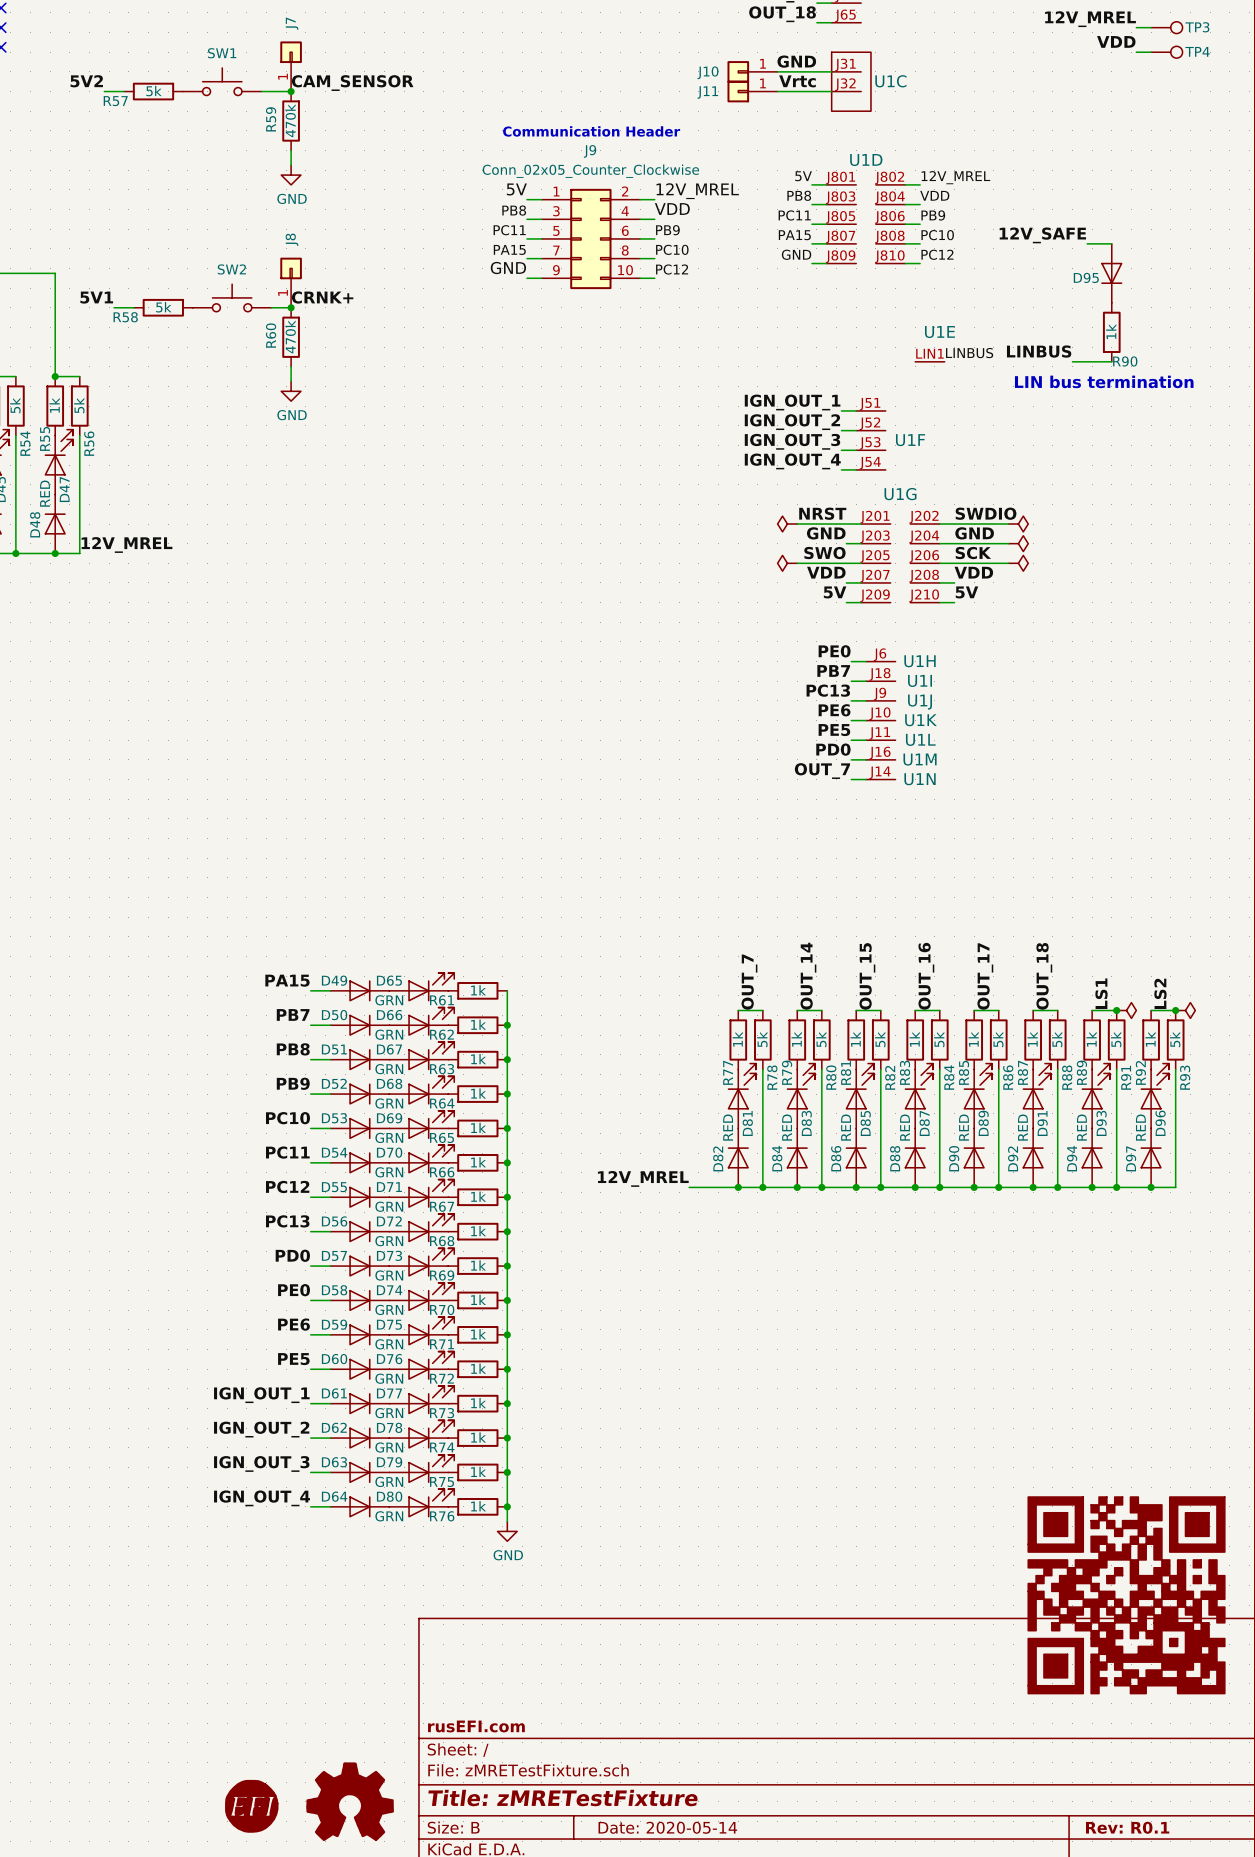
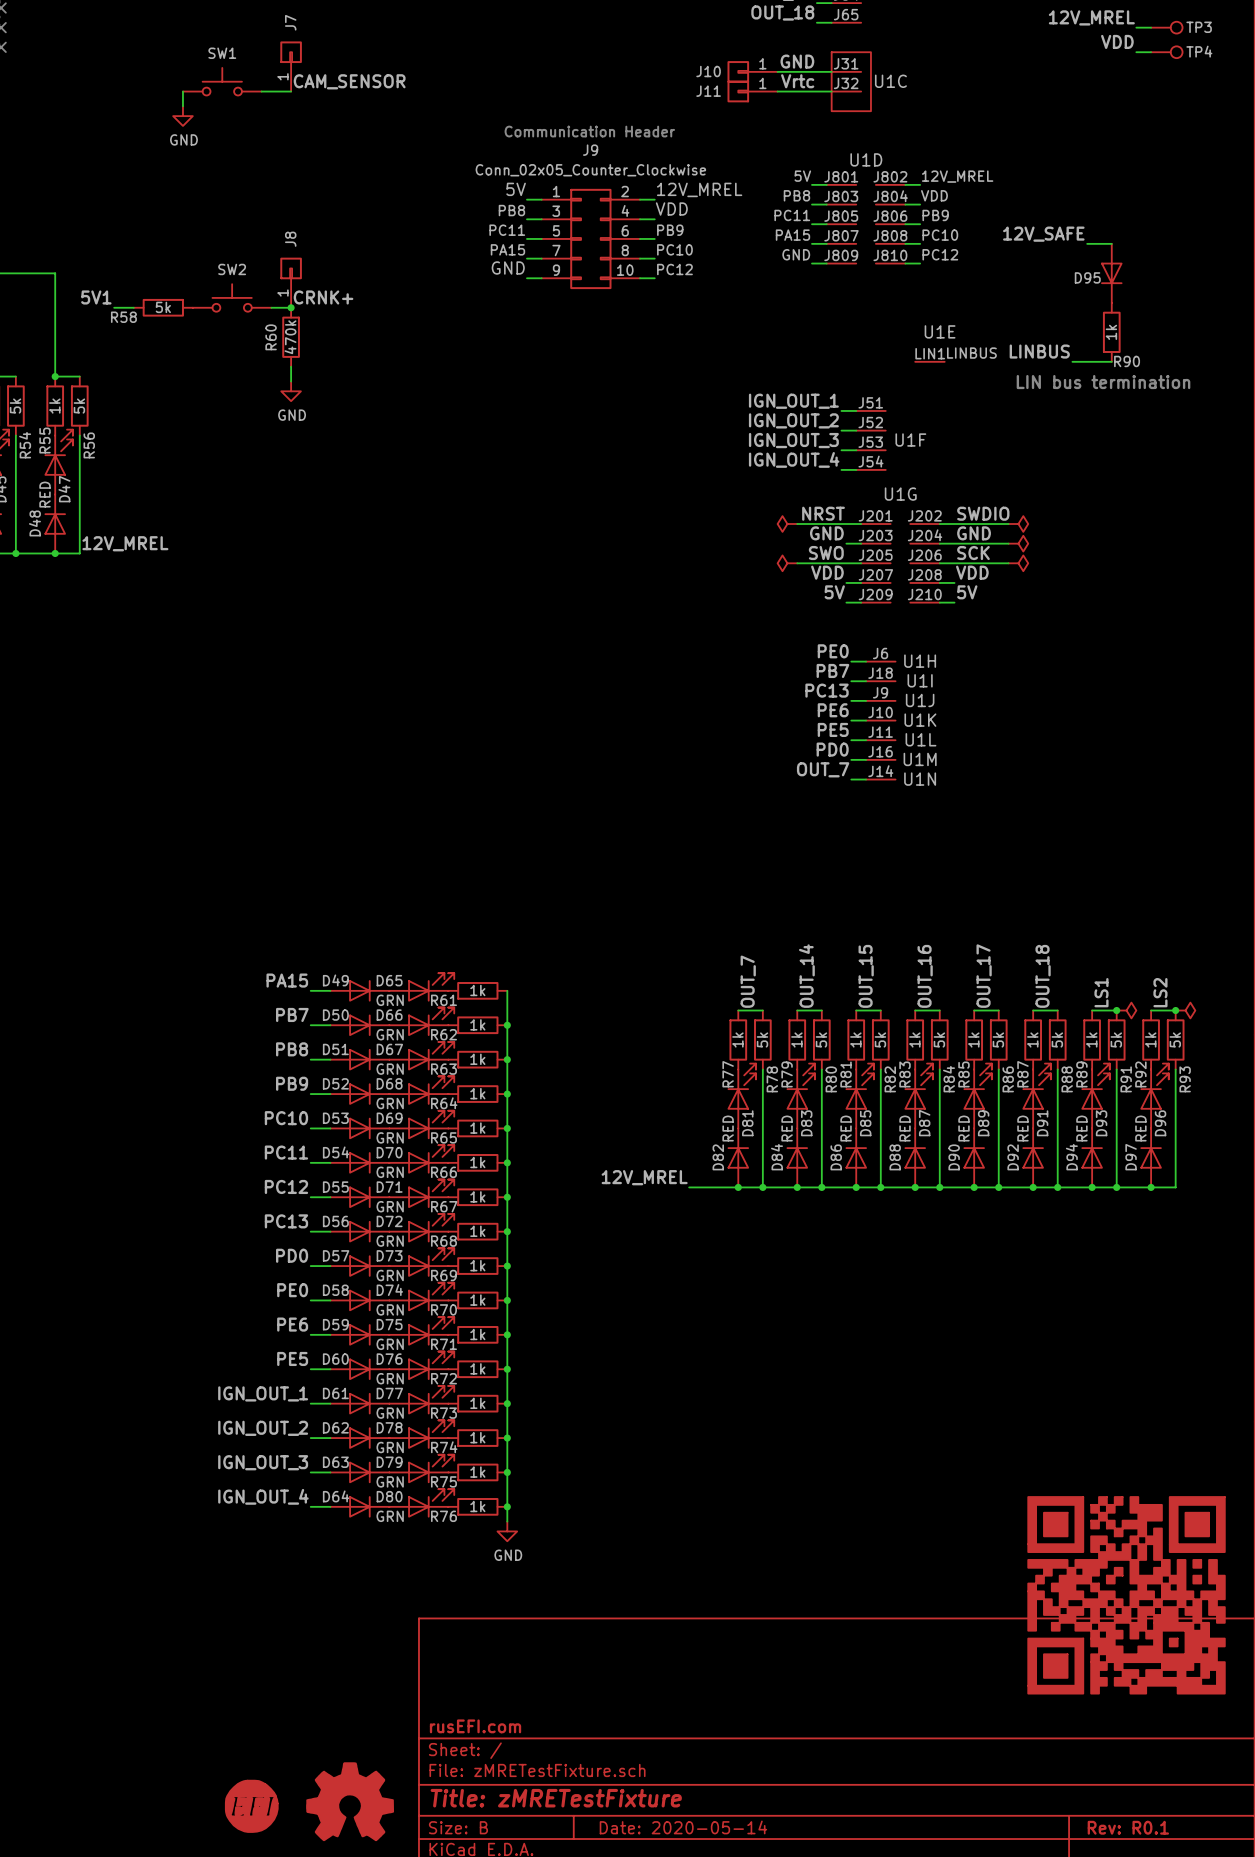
label: 5V2 (86, 81) -> none
wire: (104, 91) (124, 91) -> none
R57: 5k (153, 91) -> none
junction: (291, 91) -> none
R59: 470k (291, 121) -> none
wire: (291, 150) (291, 165) -> (182, 91) (182, 106)
power symbol position: GND (291, 175) -> GND (182, 116)

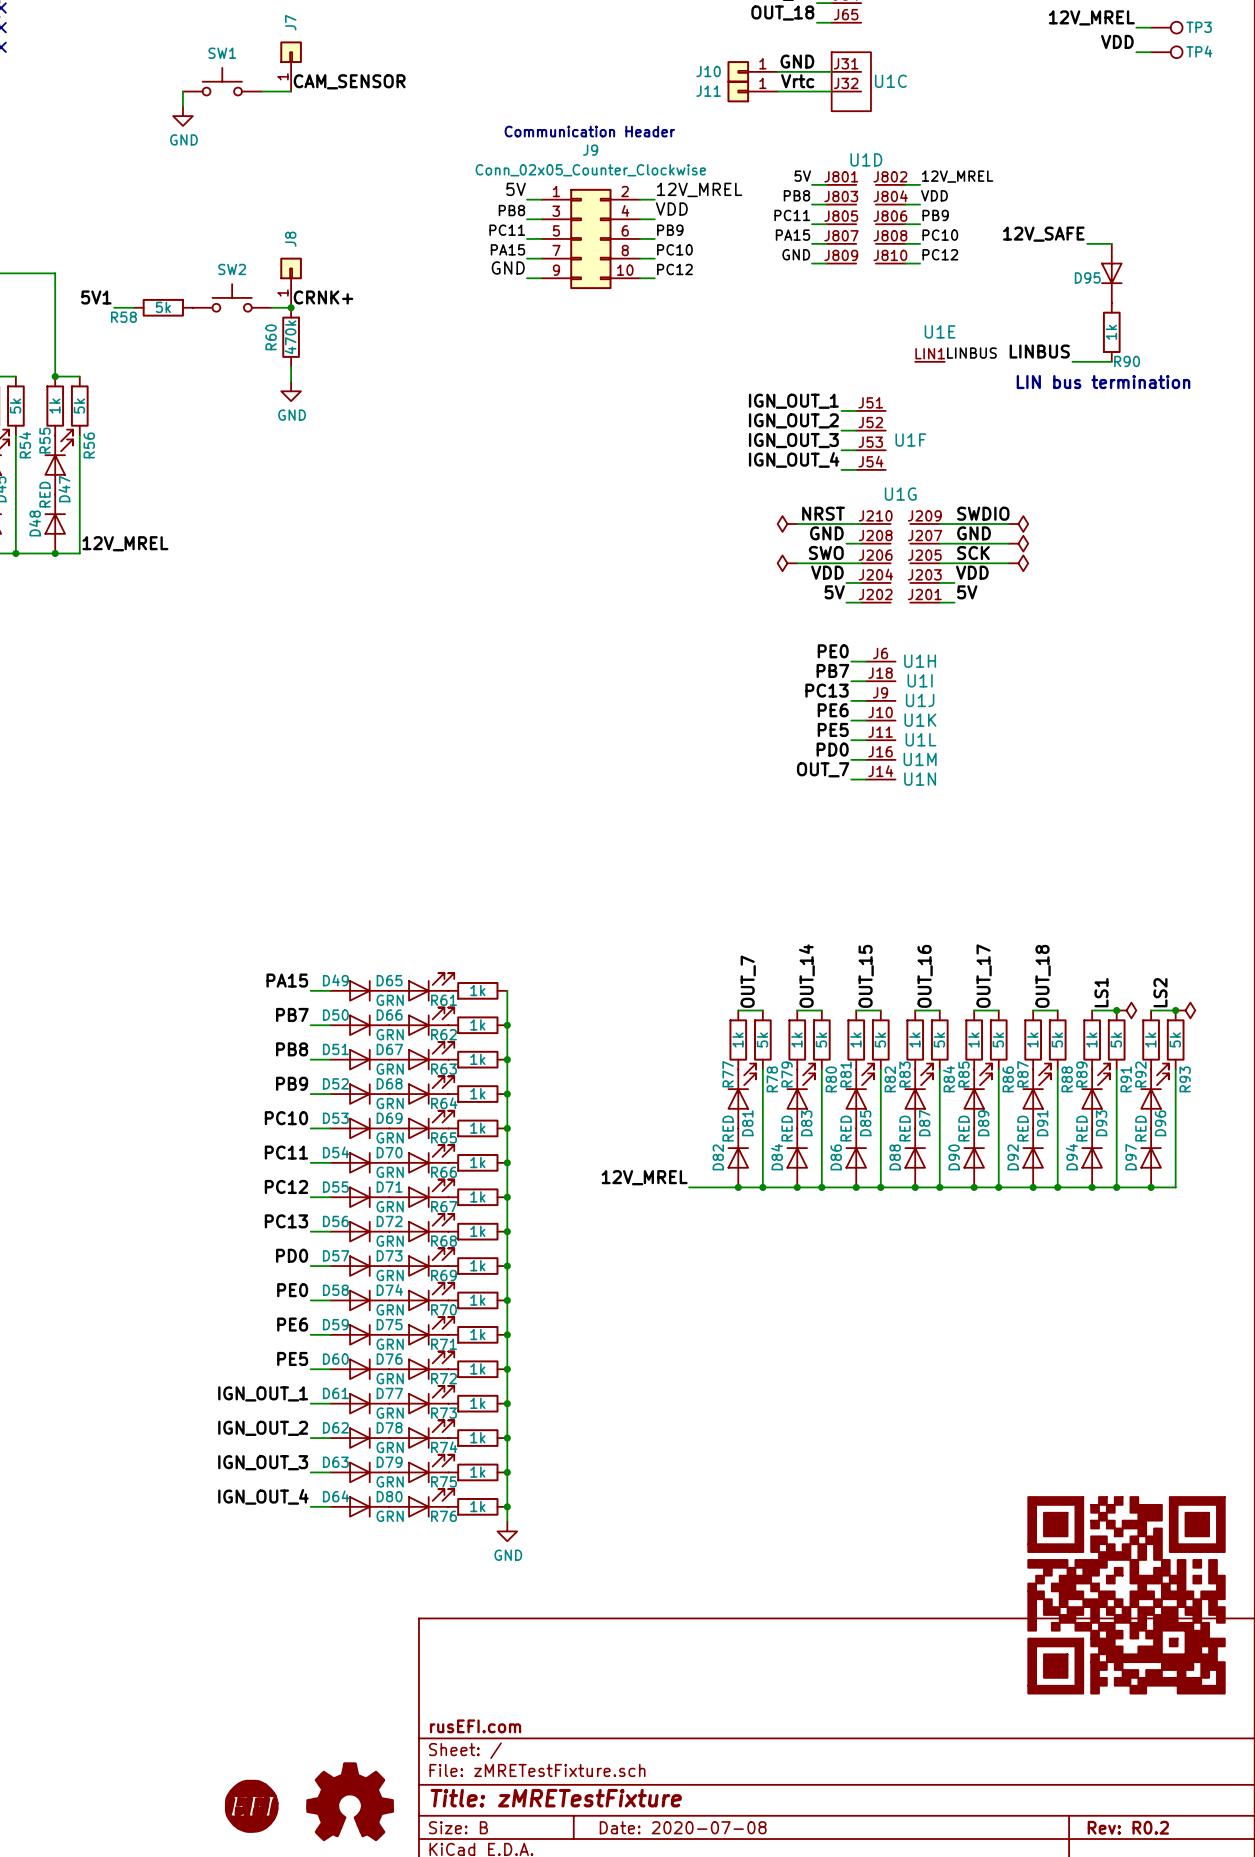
U1G rotation: 0° (900, 563) -> 180° (900, 563)
title block: Date: 2020-05-14 (683, 1827) -> Date: 2020-07-08 (683, 1827)
title block: Rev: R0.1 (1128, 1827) -> Rev: R0.2 (1128, 1827)

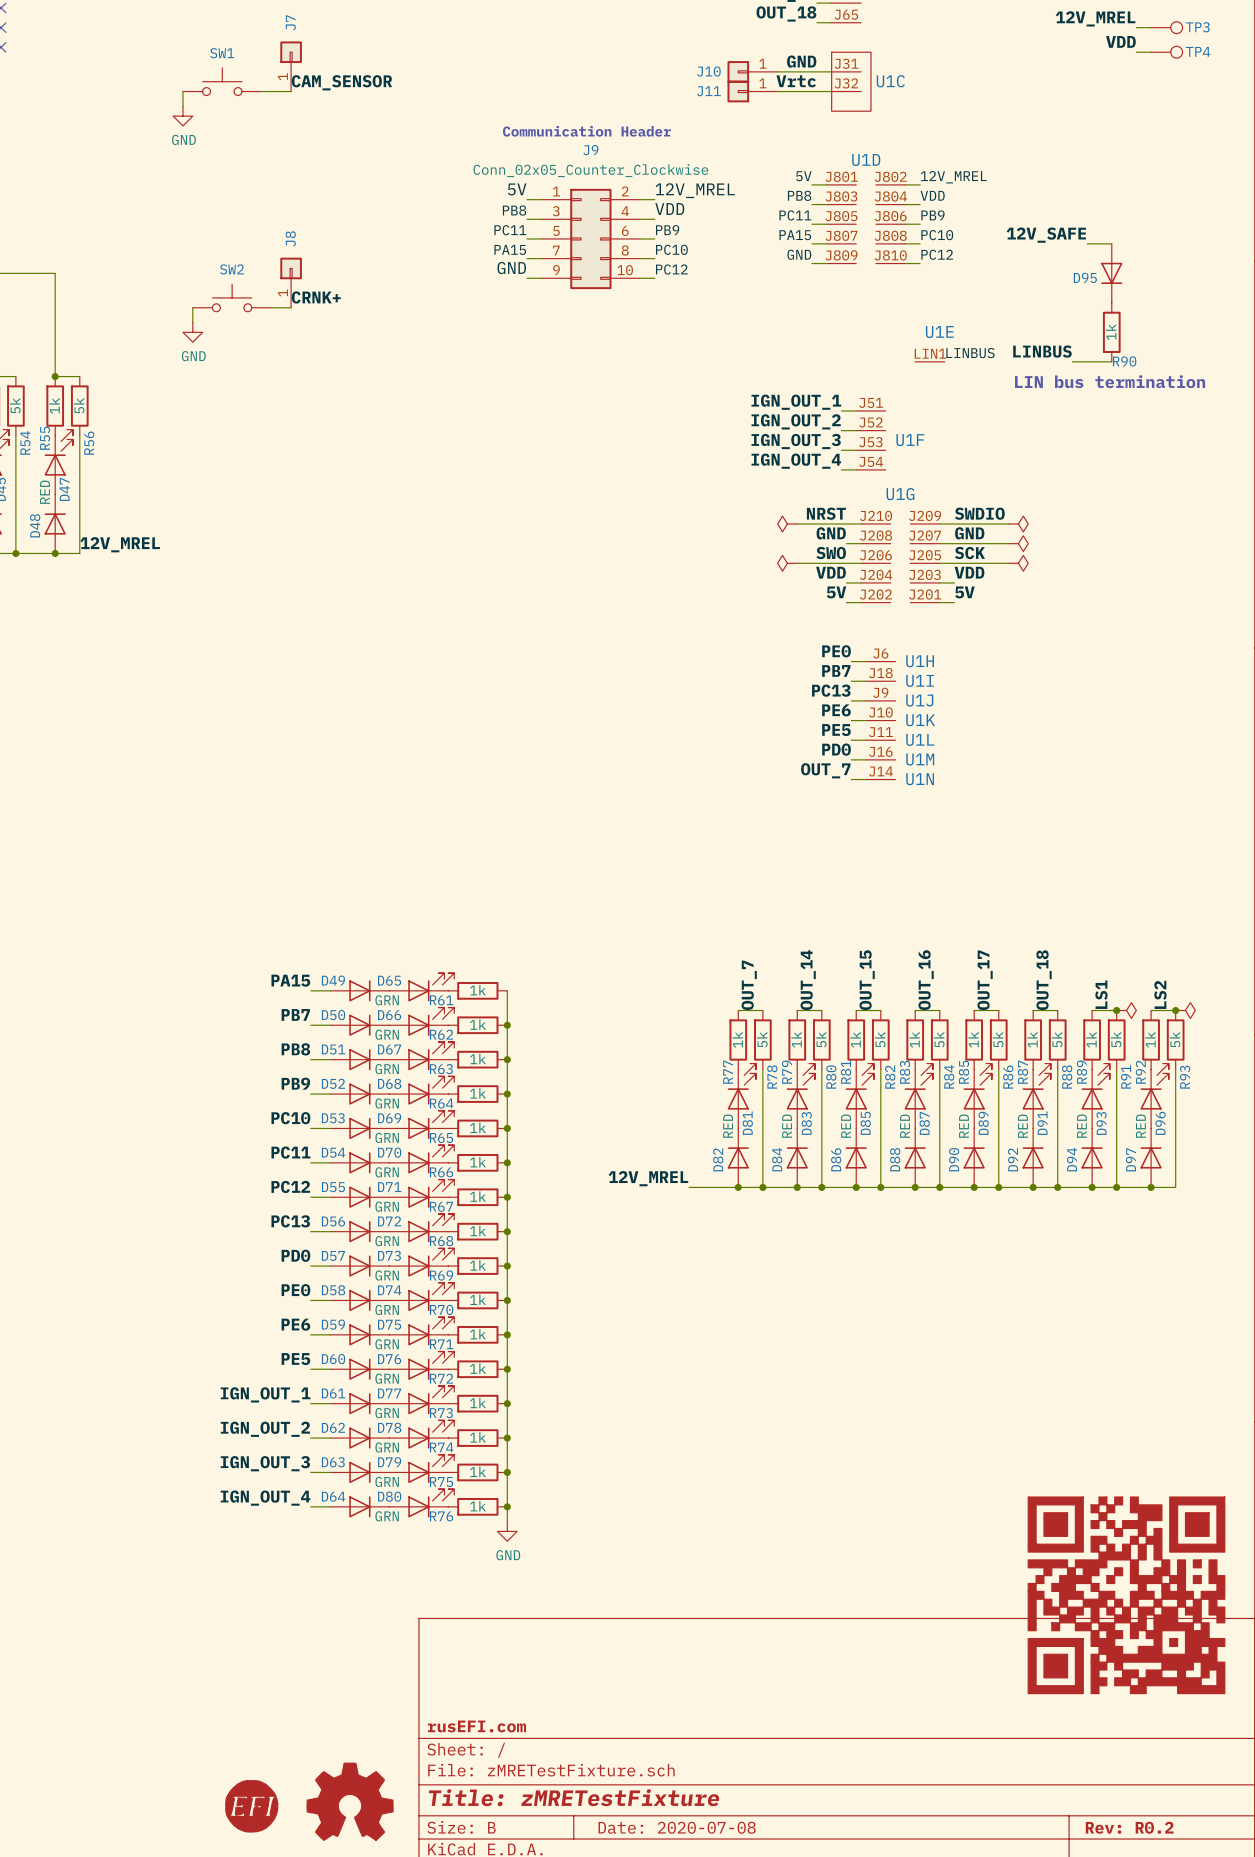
label: 5V1 (96, 297) -> none
wire: (114, 307) (133, 307) -> none
R58: 5k (163, 307) -> none
junction: (291, 307) -> none
R60: 470k (291, 337) -> none
wire: (291, 366) (291, 381) -> (192, 307) (192, 322)
power symbol position: GND (291, 391) -> GND (192, 332)

